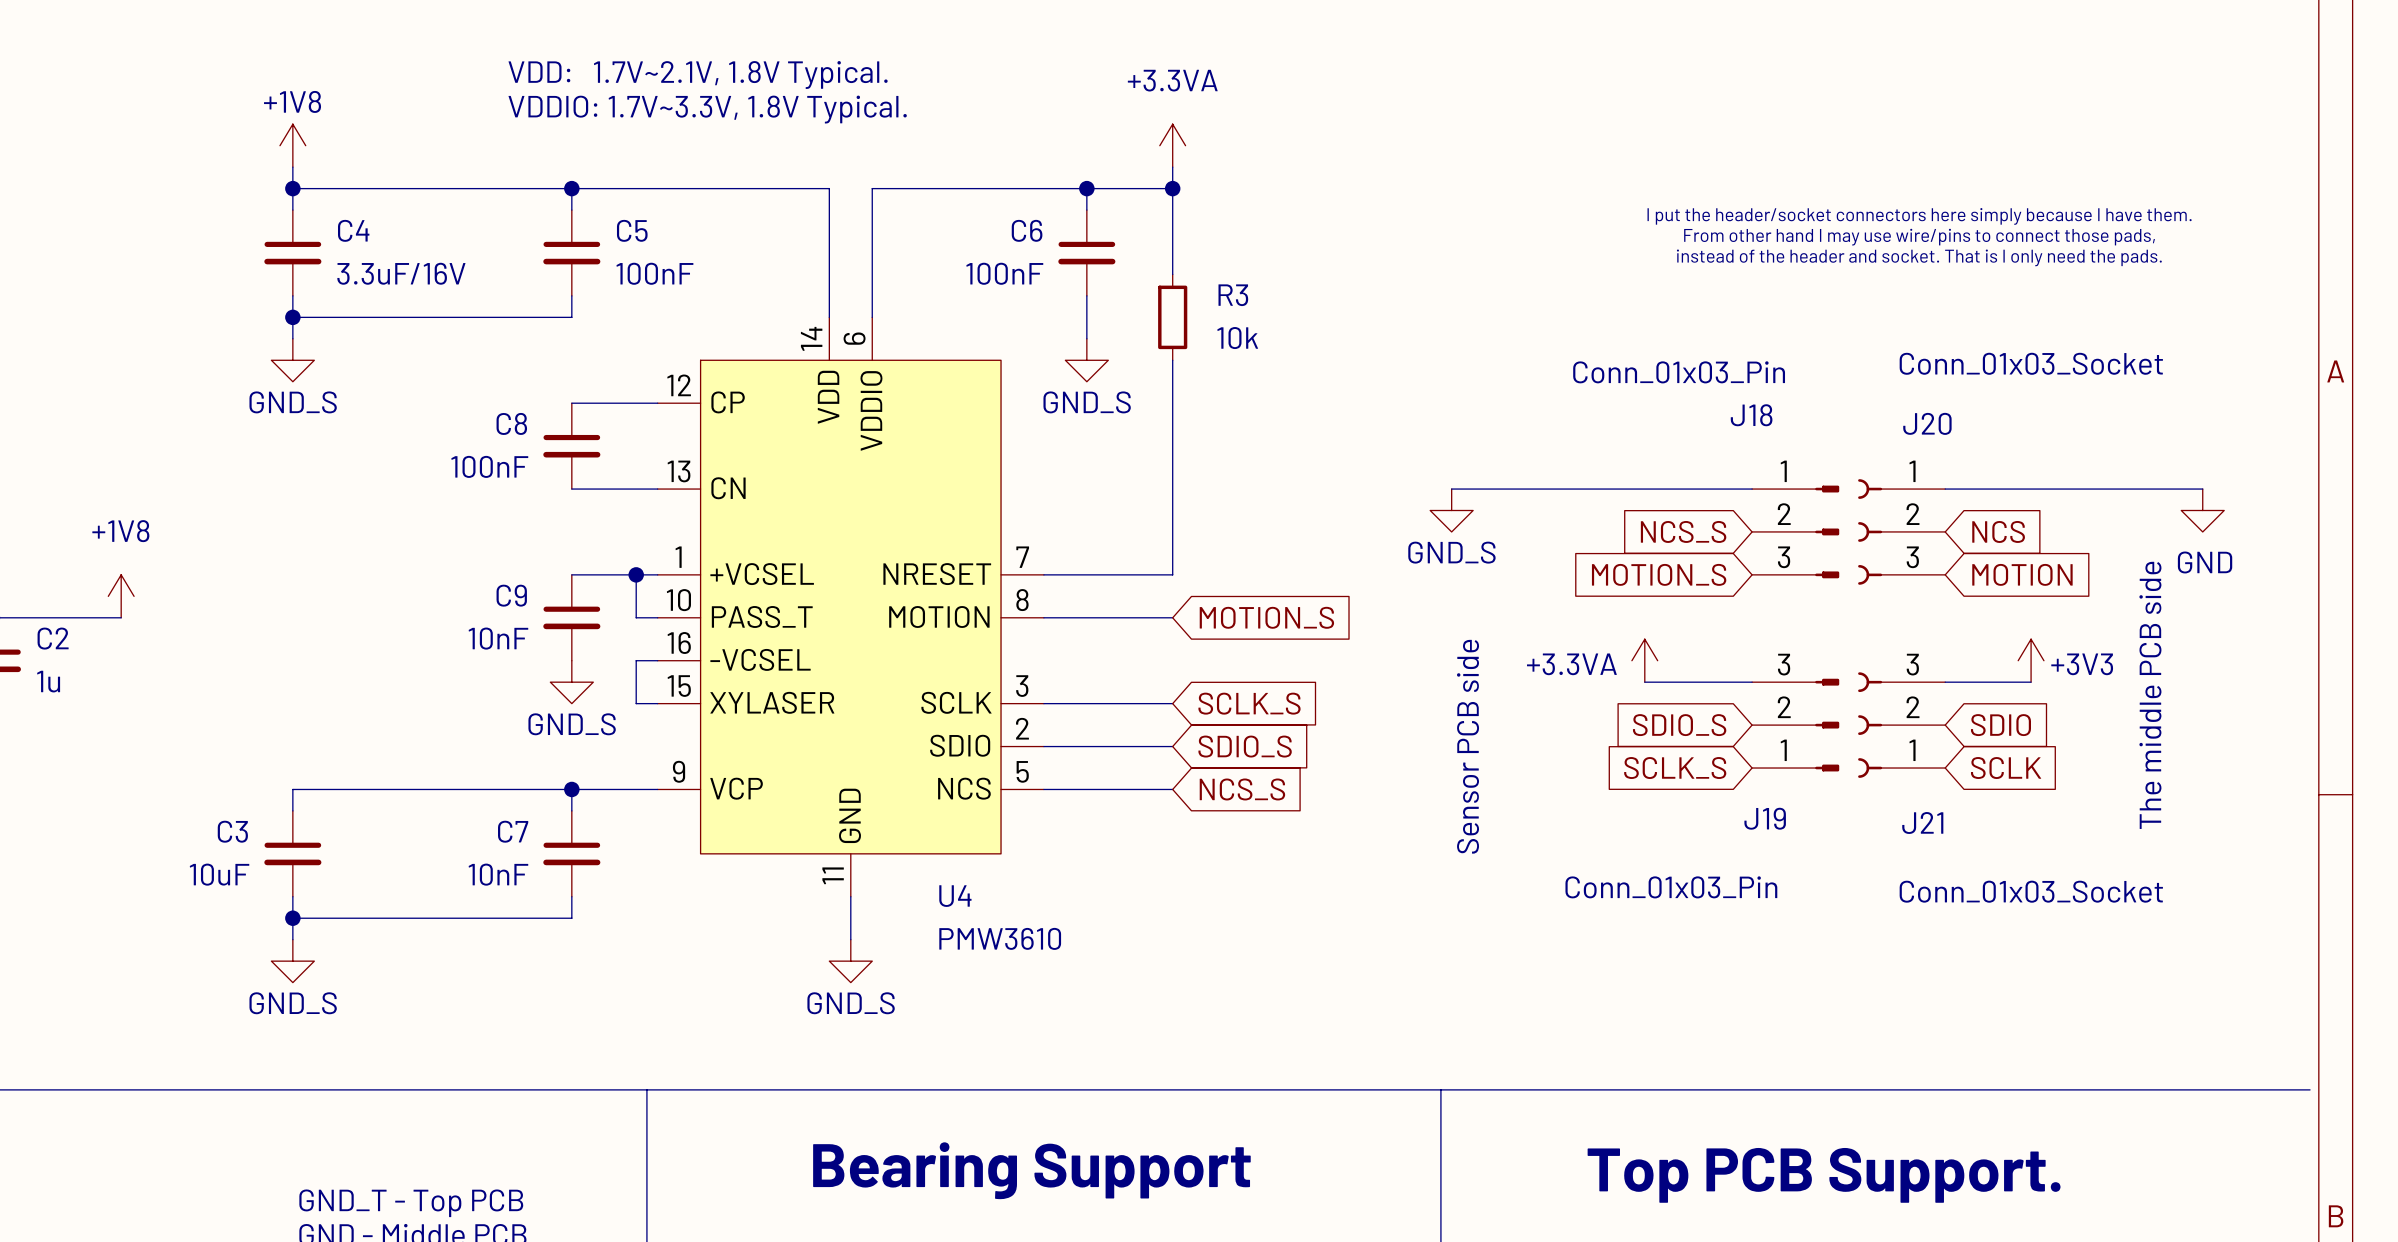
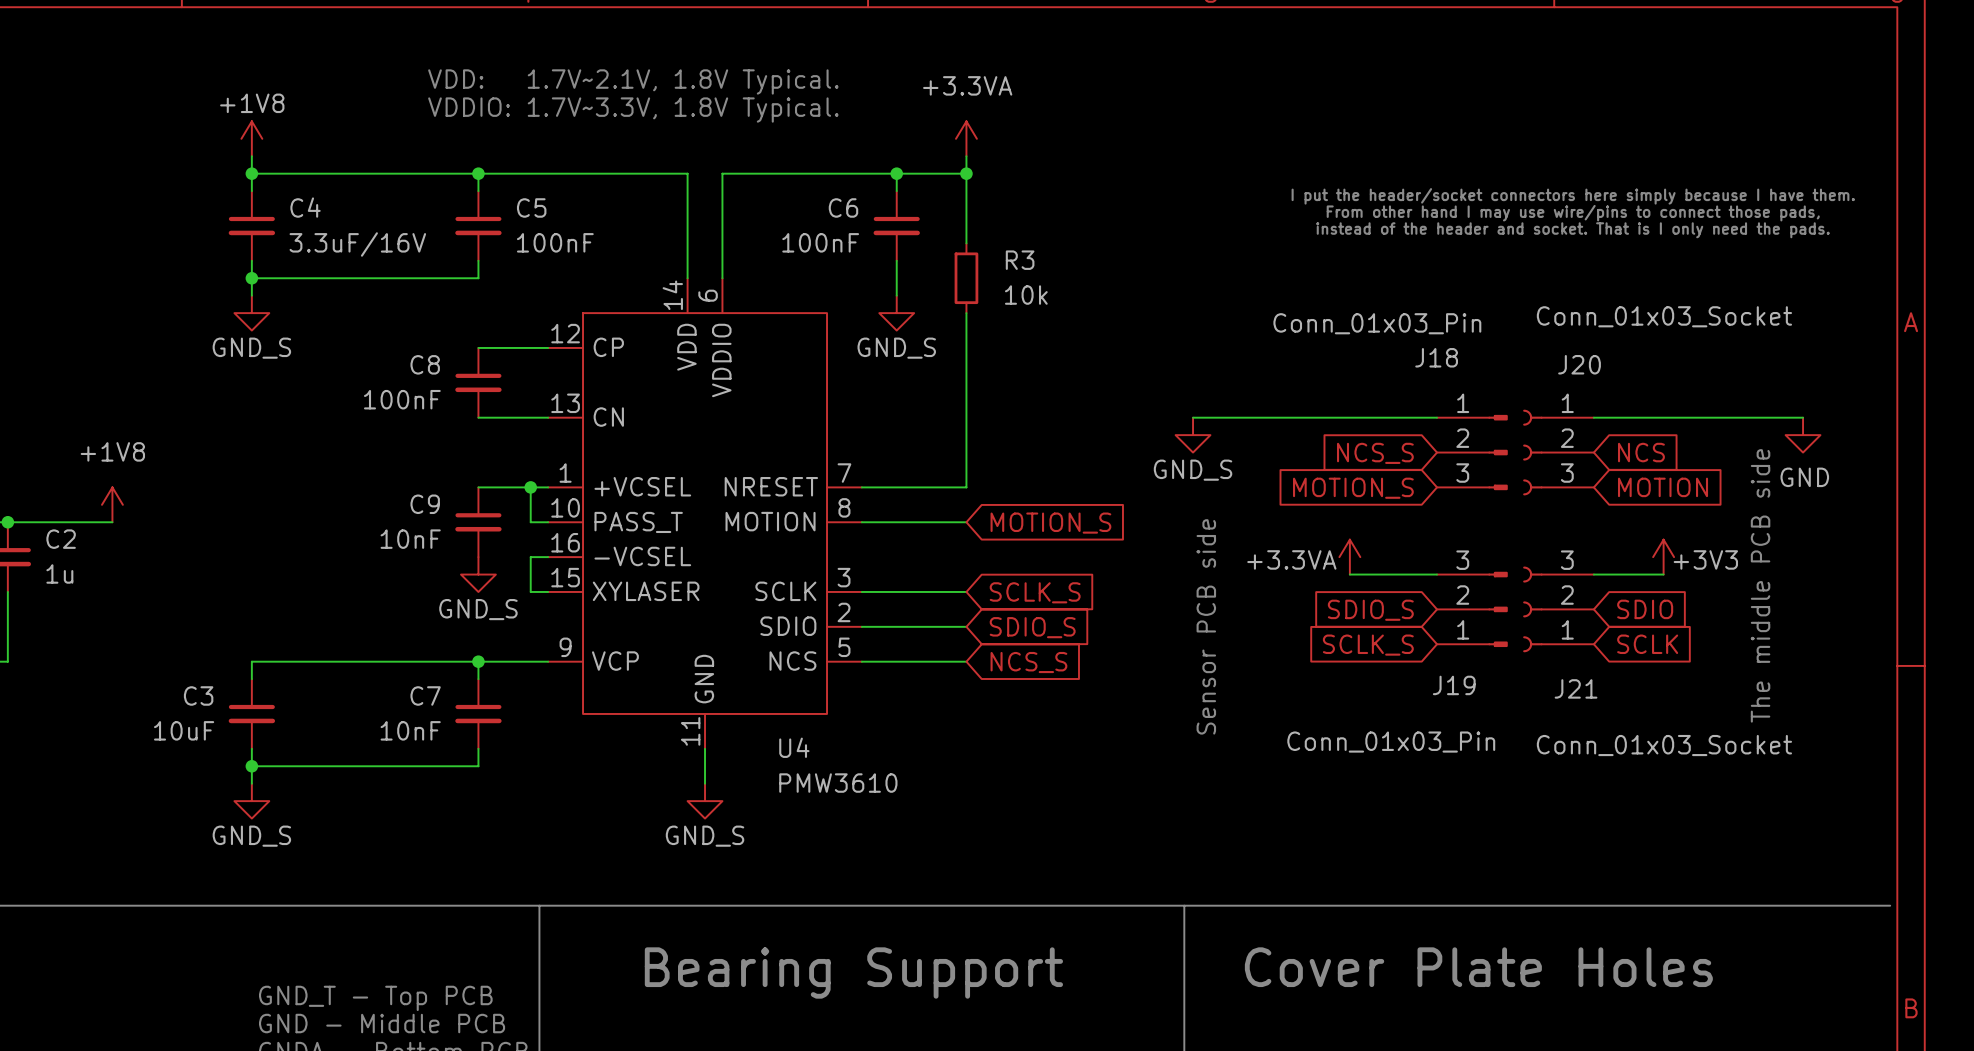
text: none -> Cover Plate Holes (1478, 967)
text: Top PCB Support. (1824, 1175) -> none

